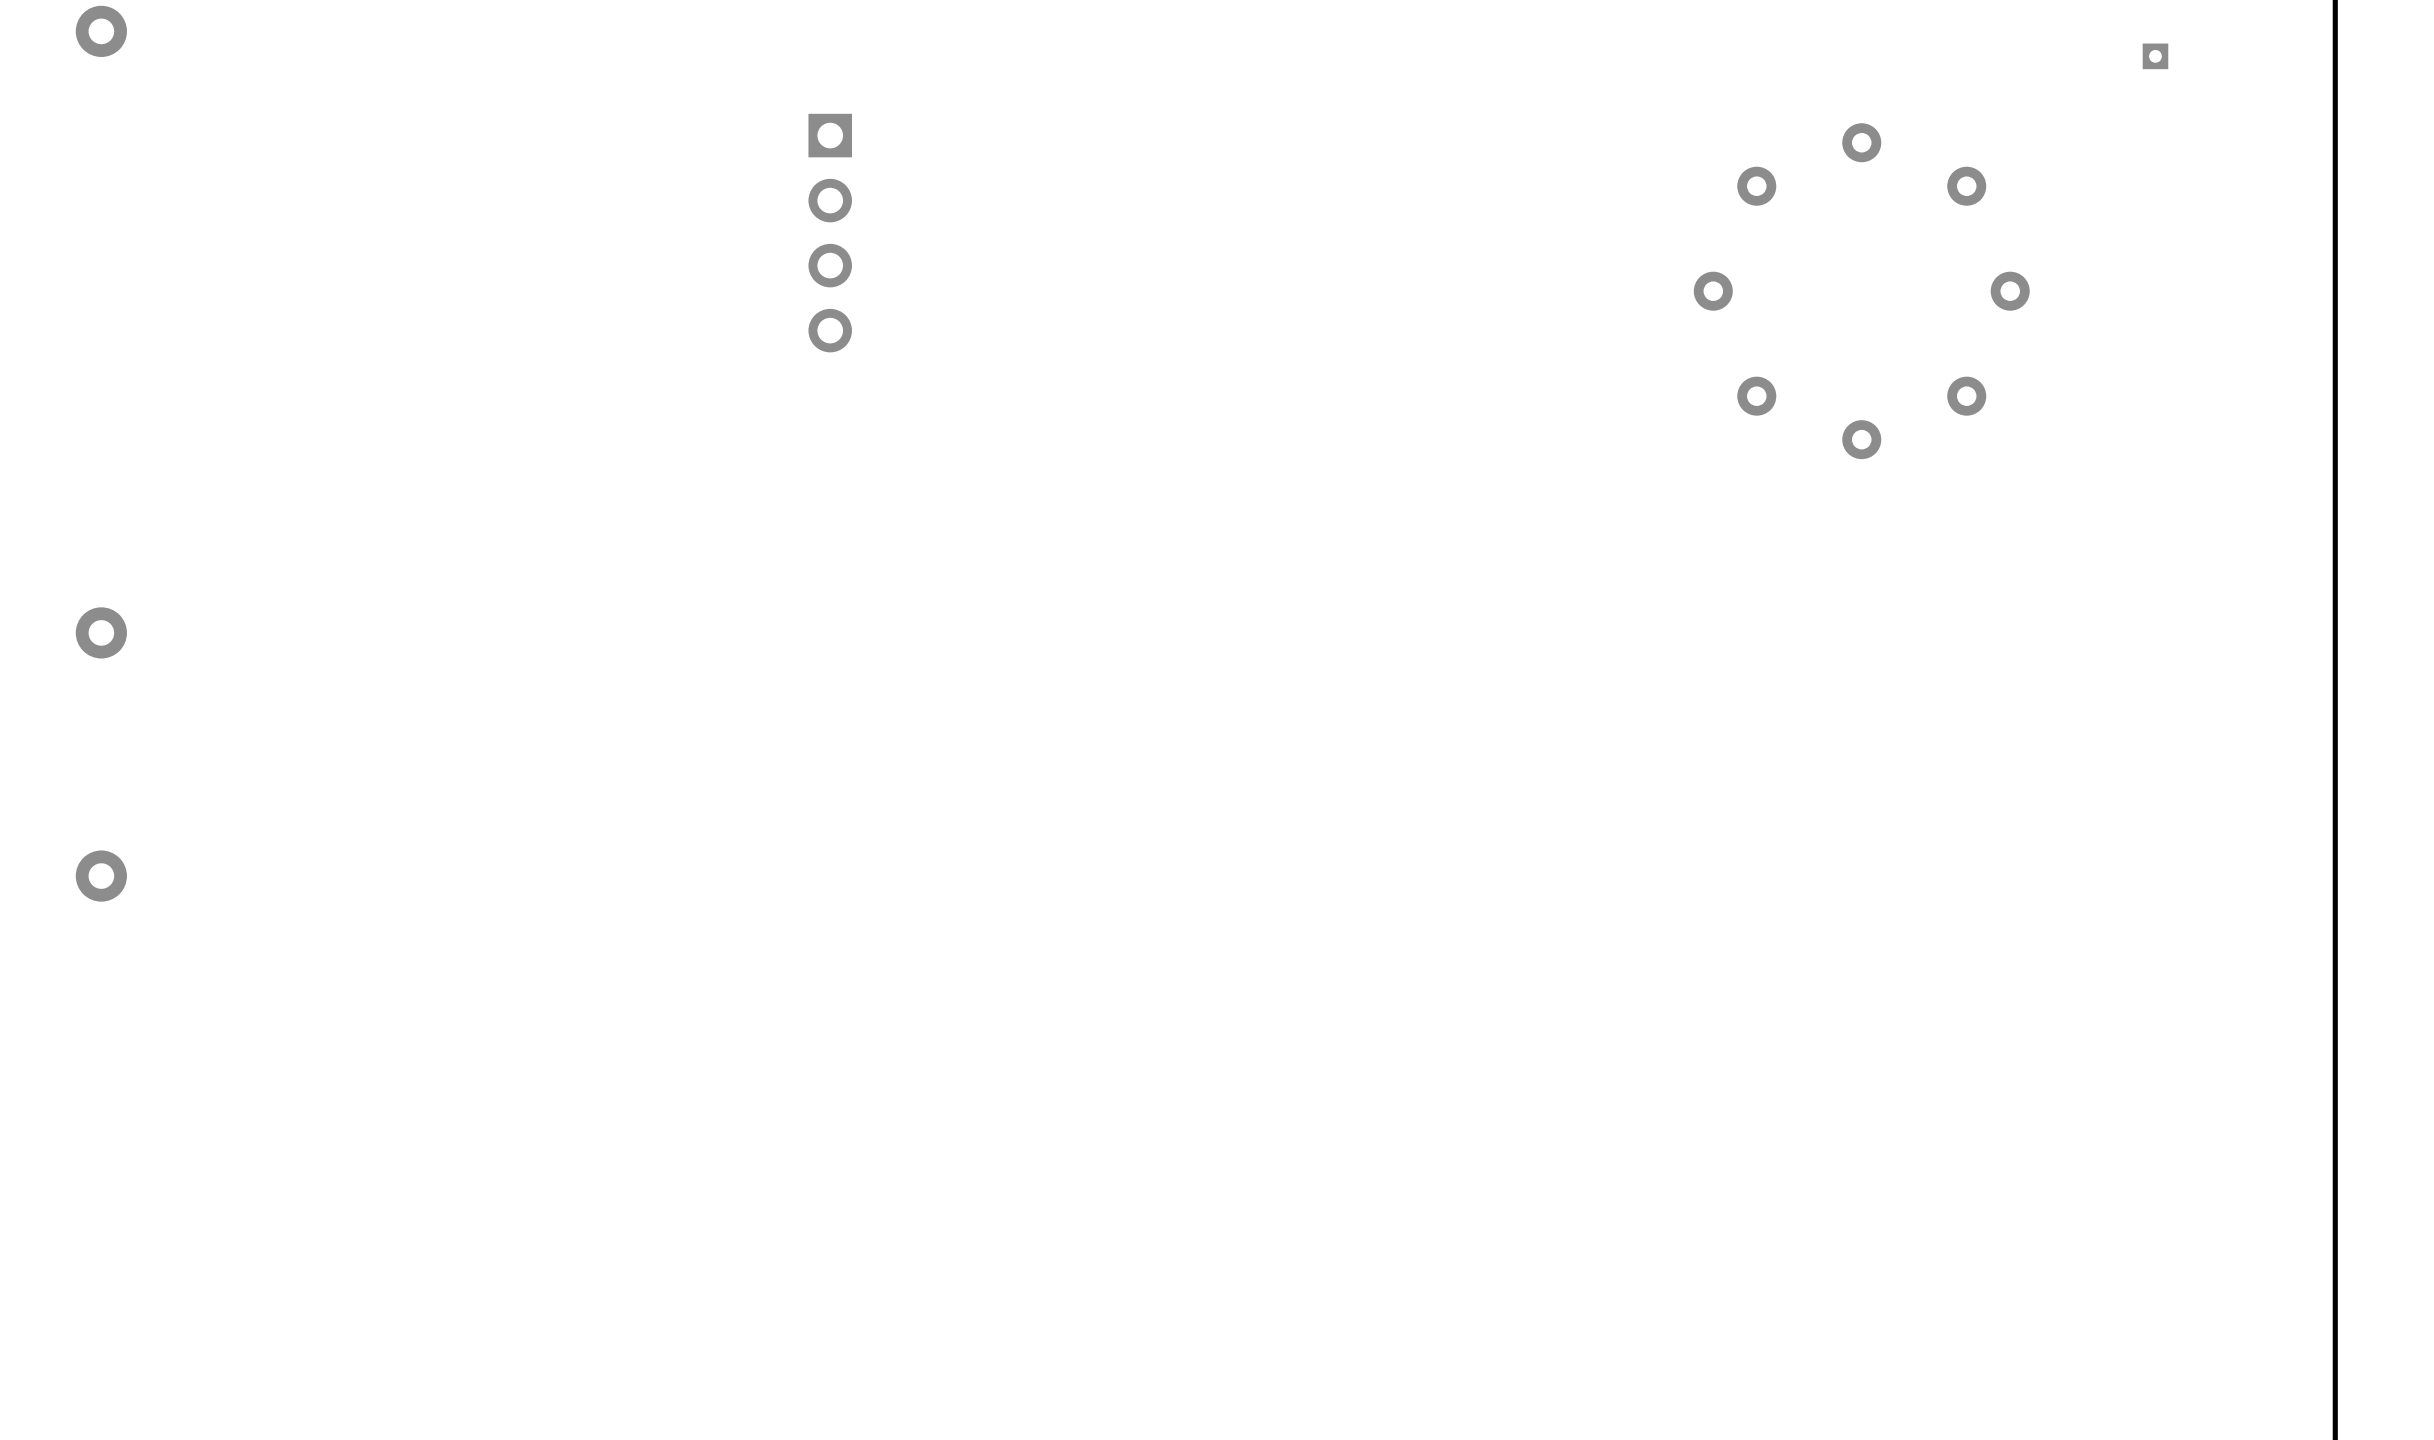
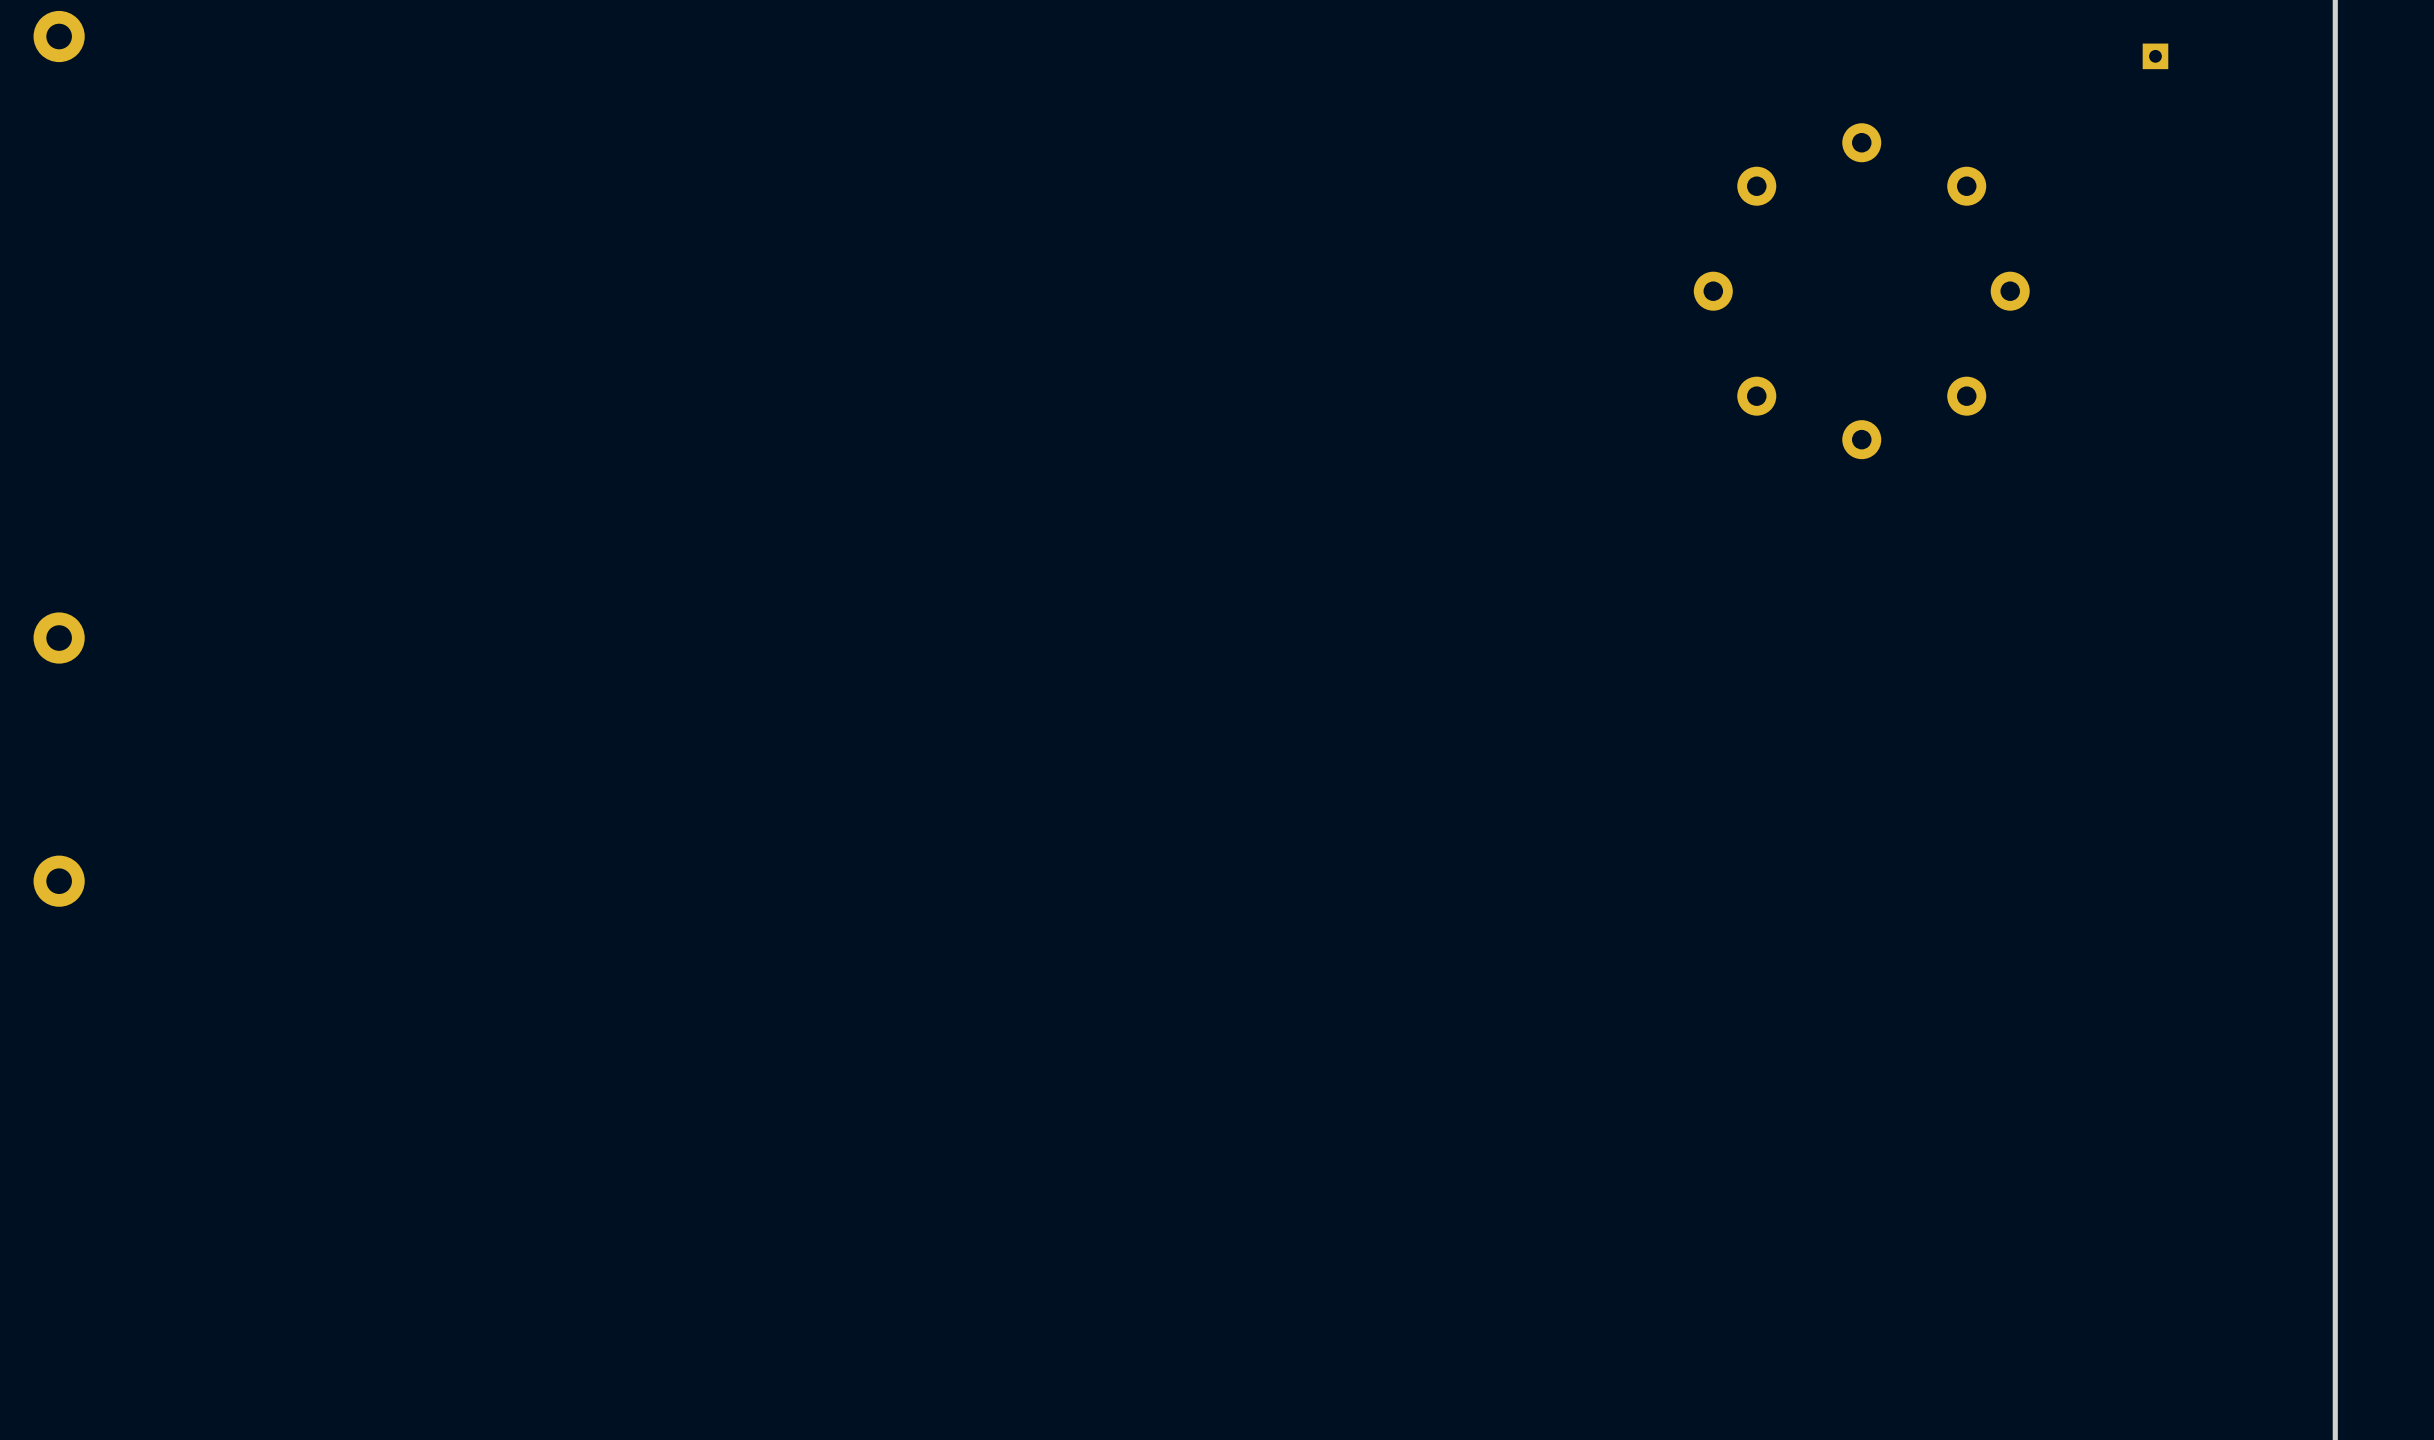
part position: (101, 31) -> (59, 36)
part: (830, 233) -> none
part position: (101, 632) -> (59, 638)
part position: (101, 876) -> (59, 881)

